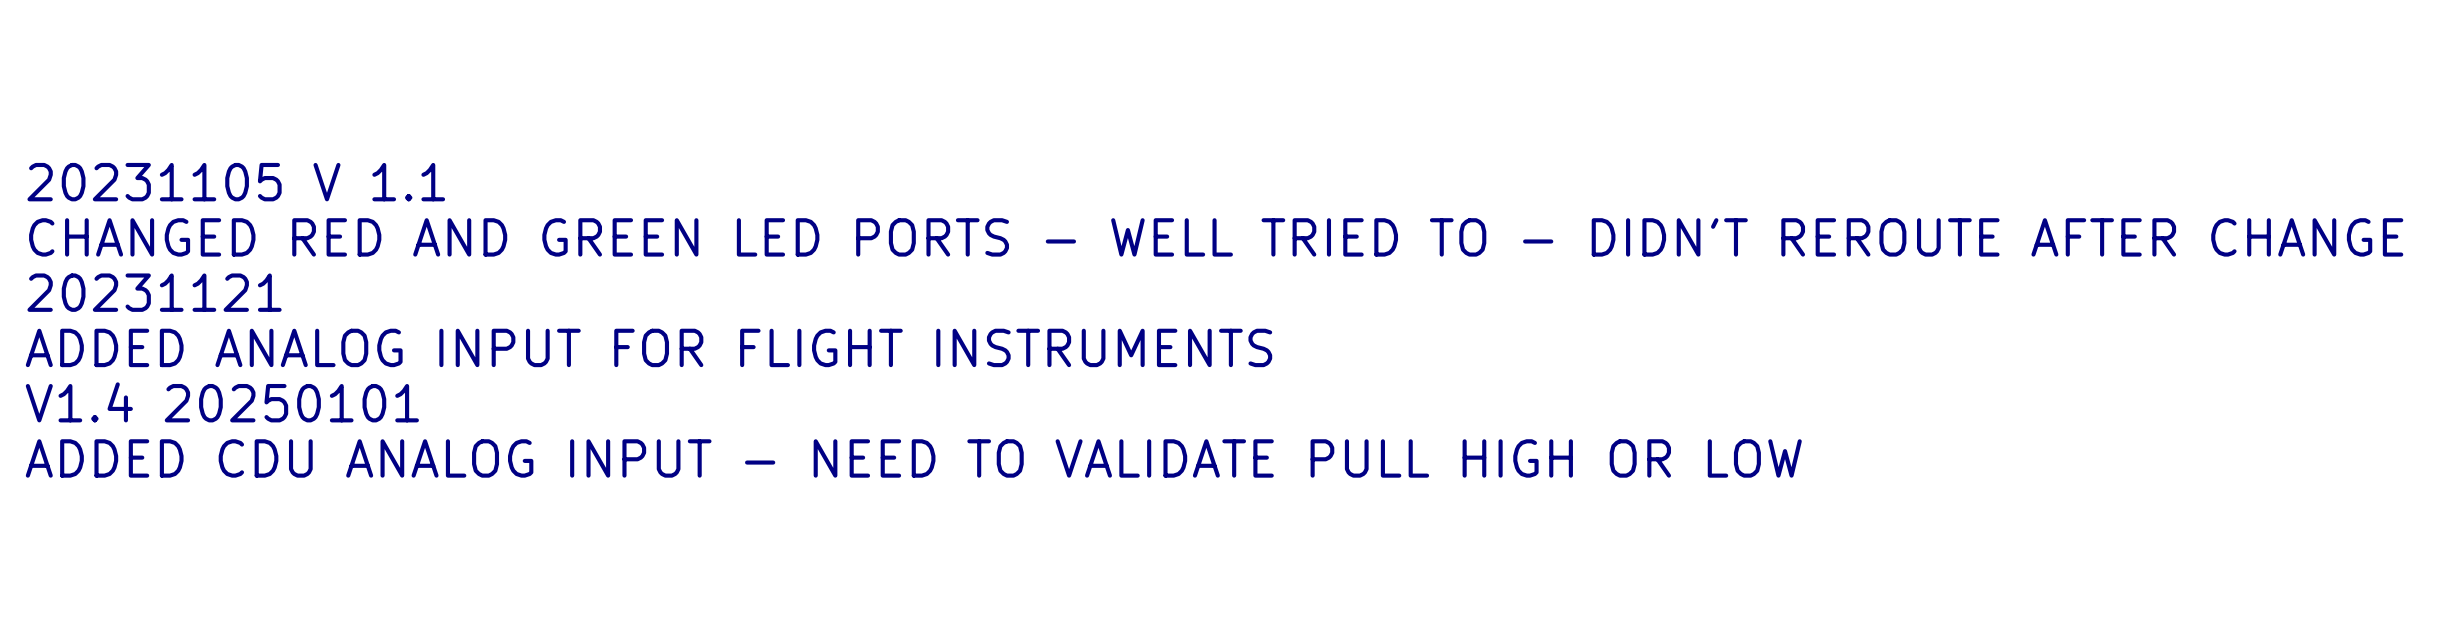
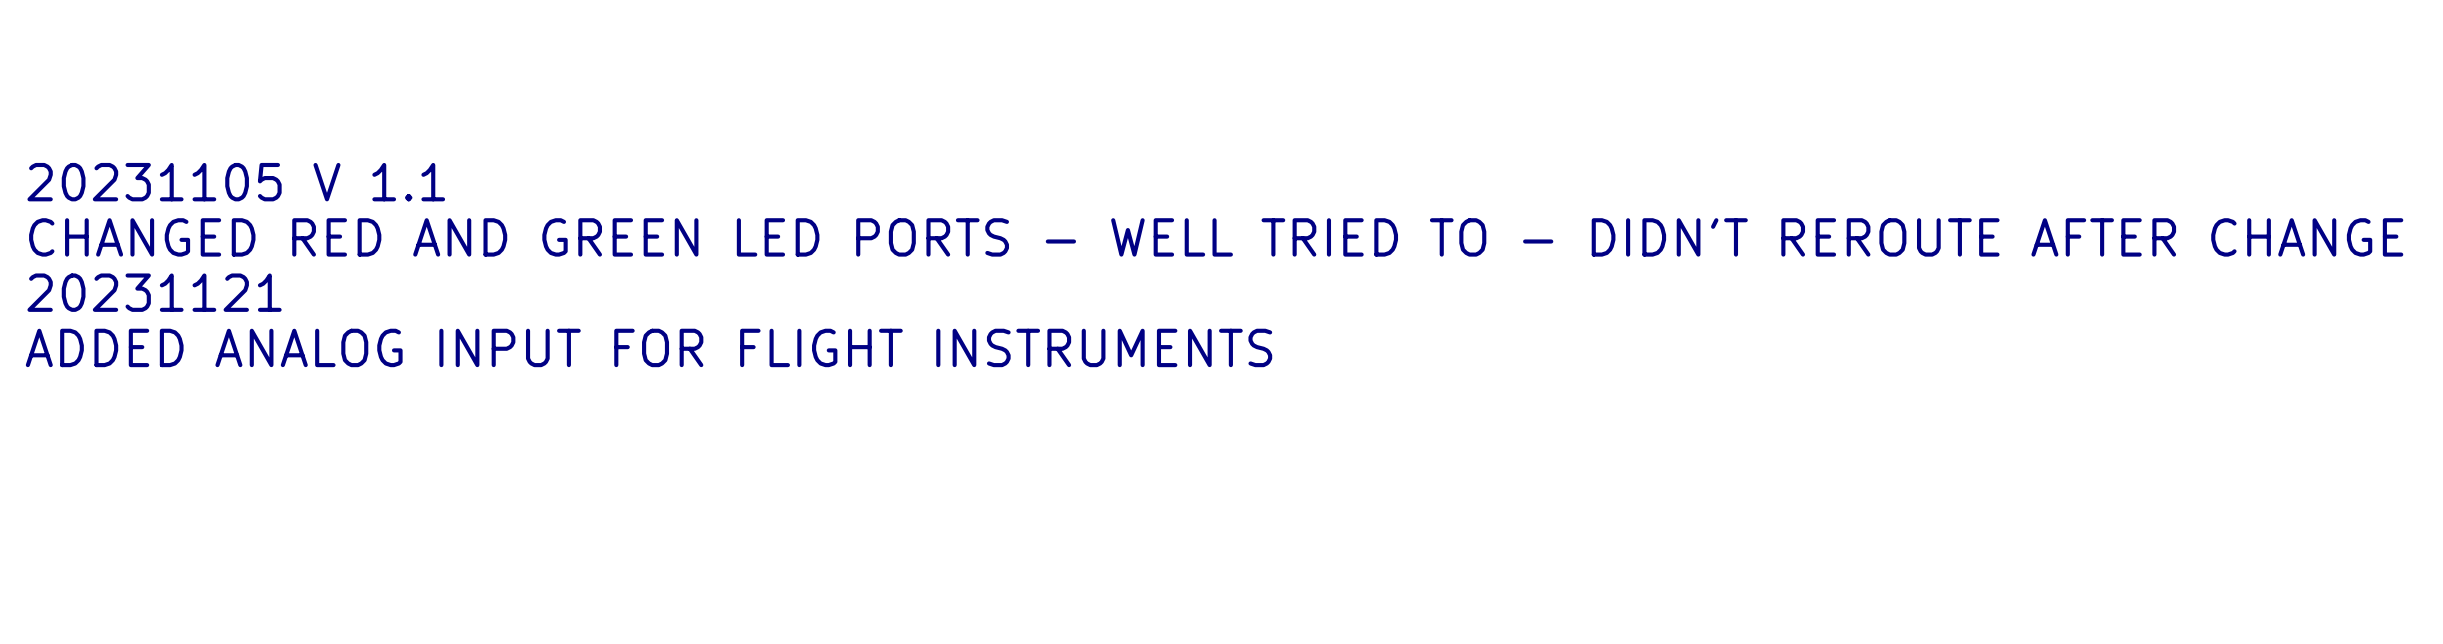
text: V1.4 20250101 (222, 402) -> none
text: ADDED CDU ANALOG INPUT - NEED TO VALIDATE PULL HIGH OR LOW (913, 458) -> none

